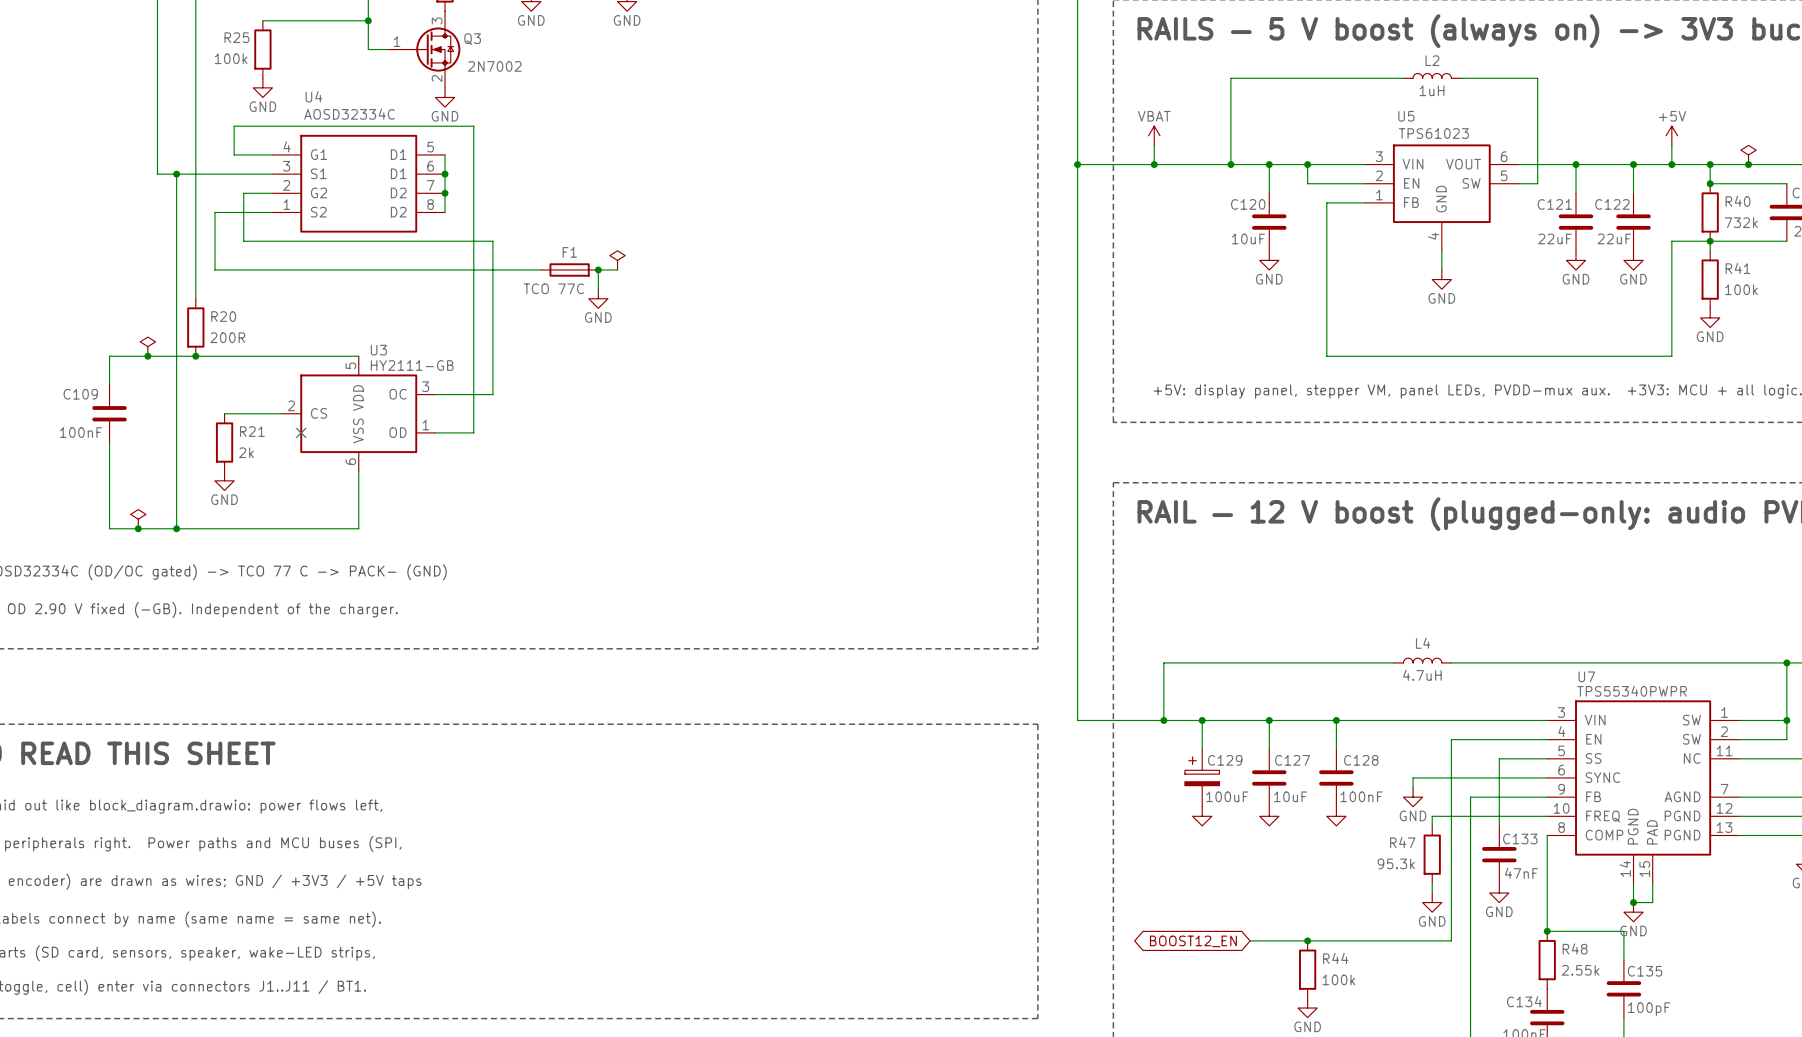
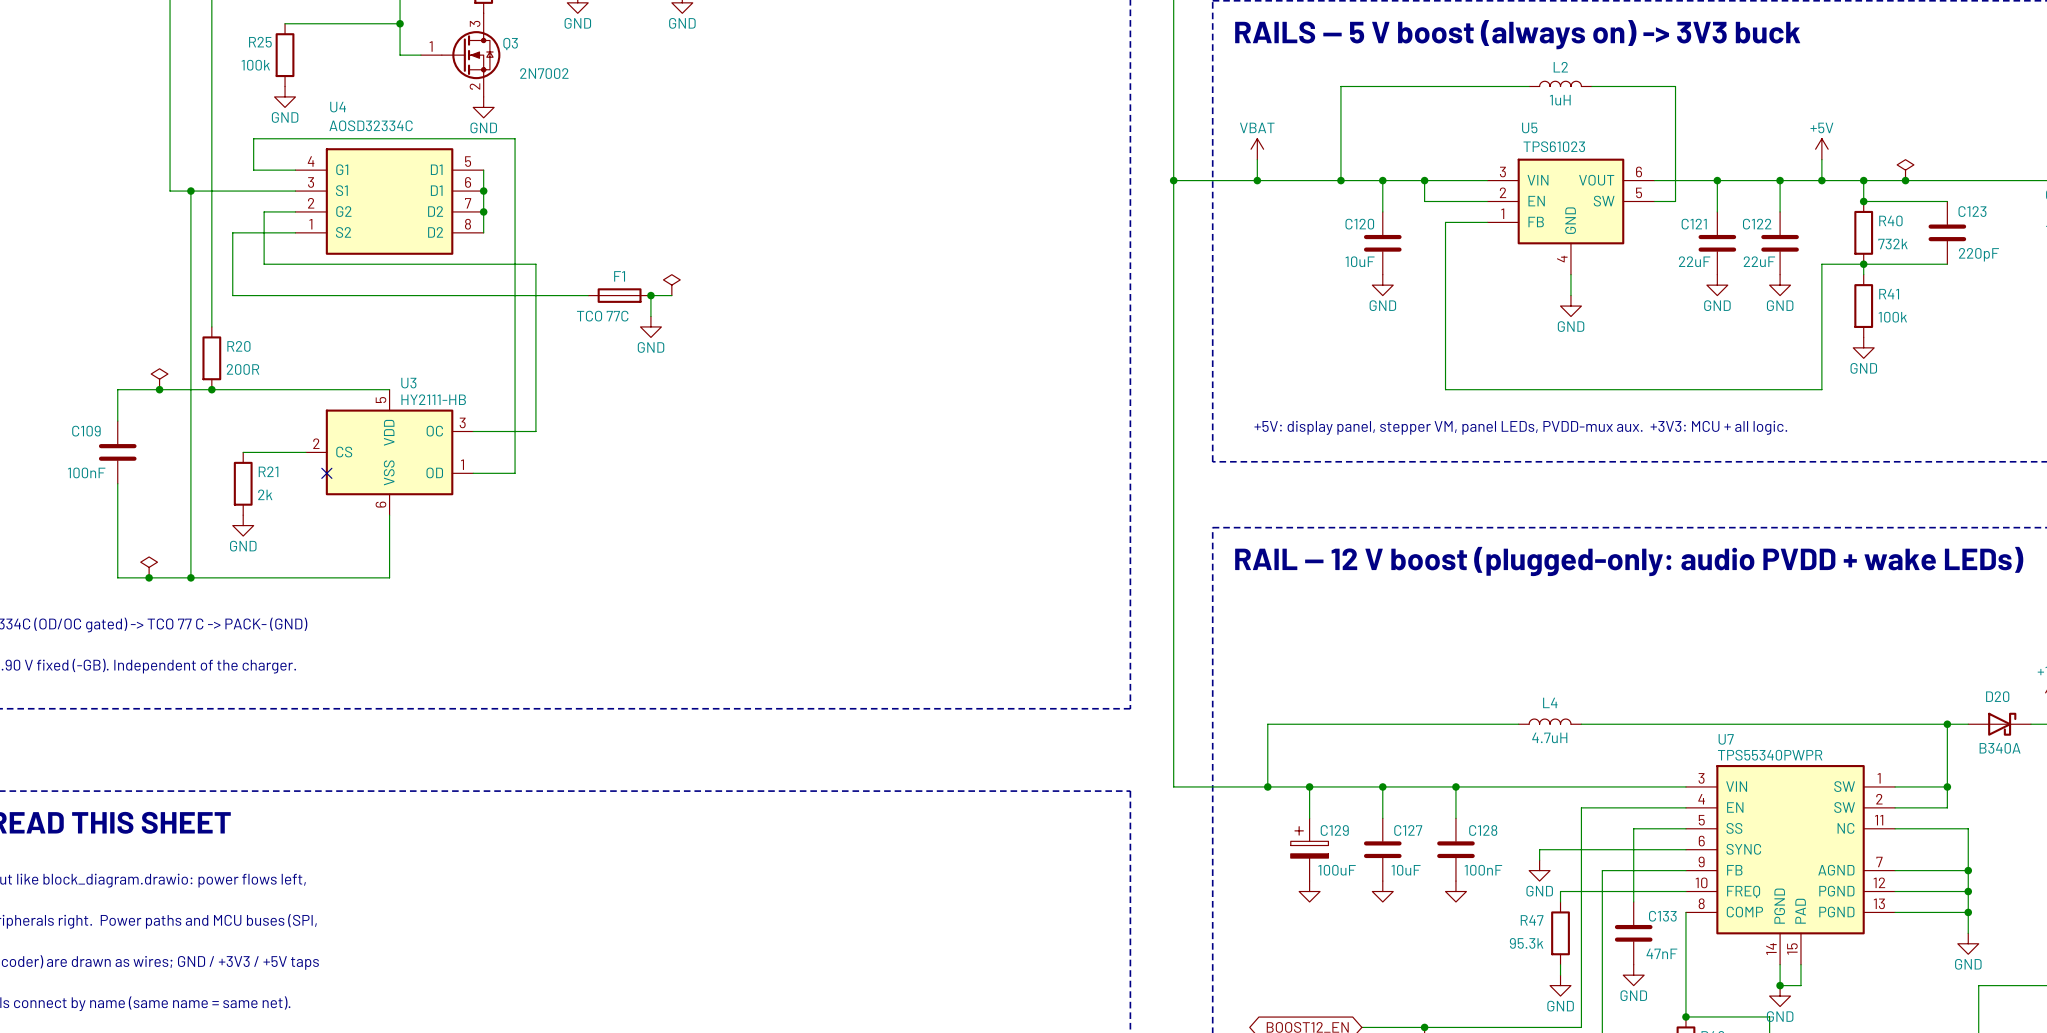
U3 value: HY2111-GB (412, 365) -> HY2111-HB (433, 399)

